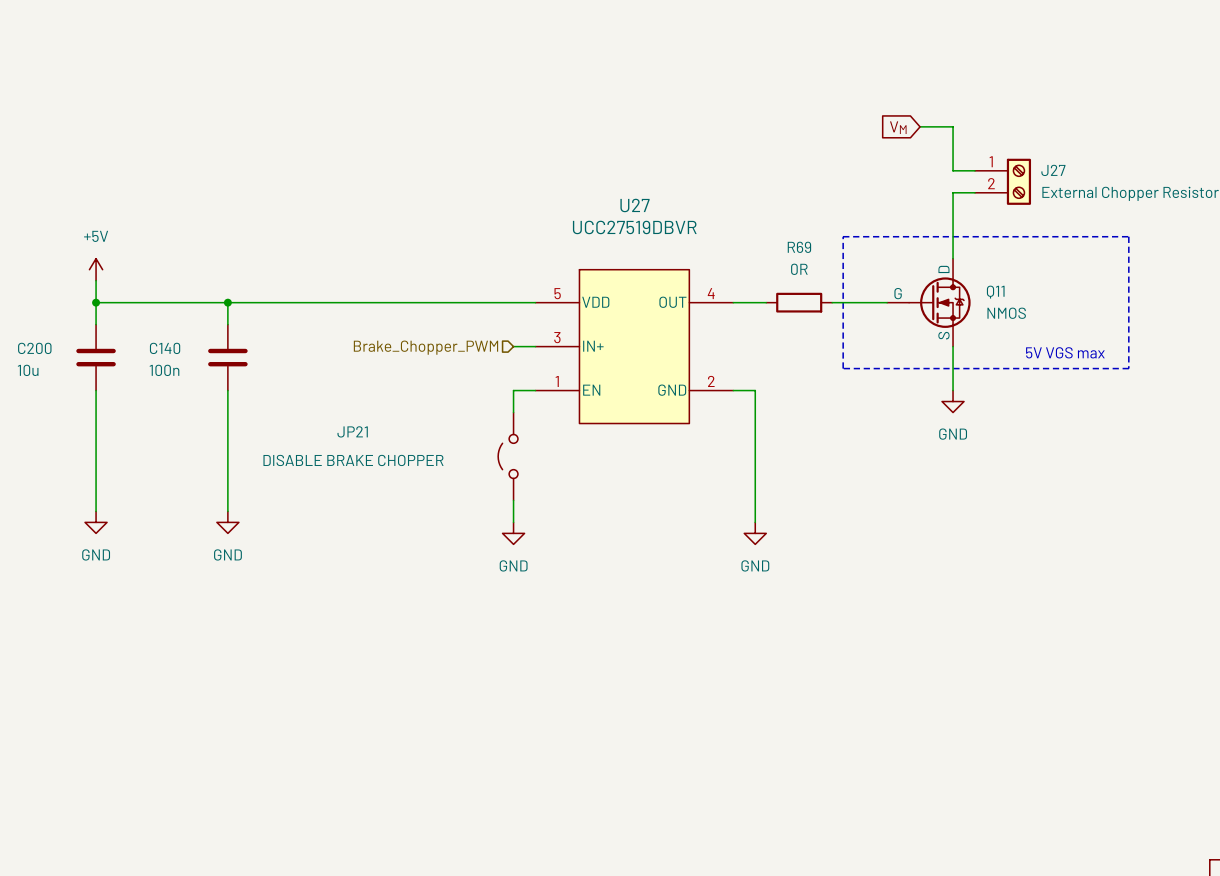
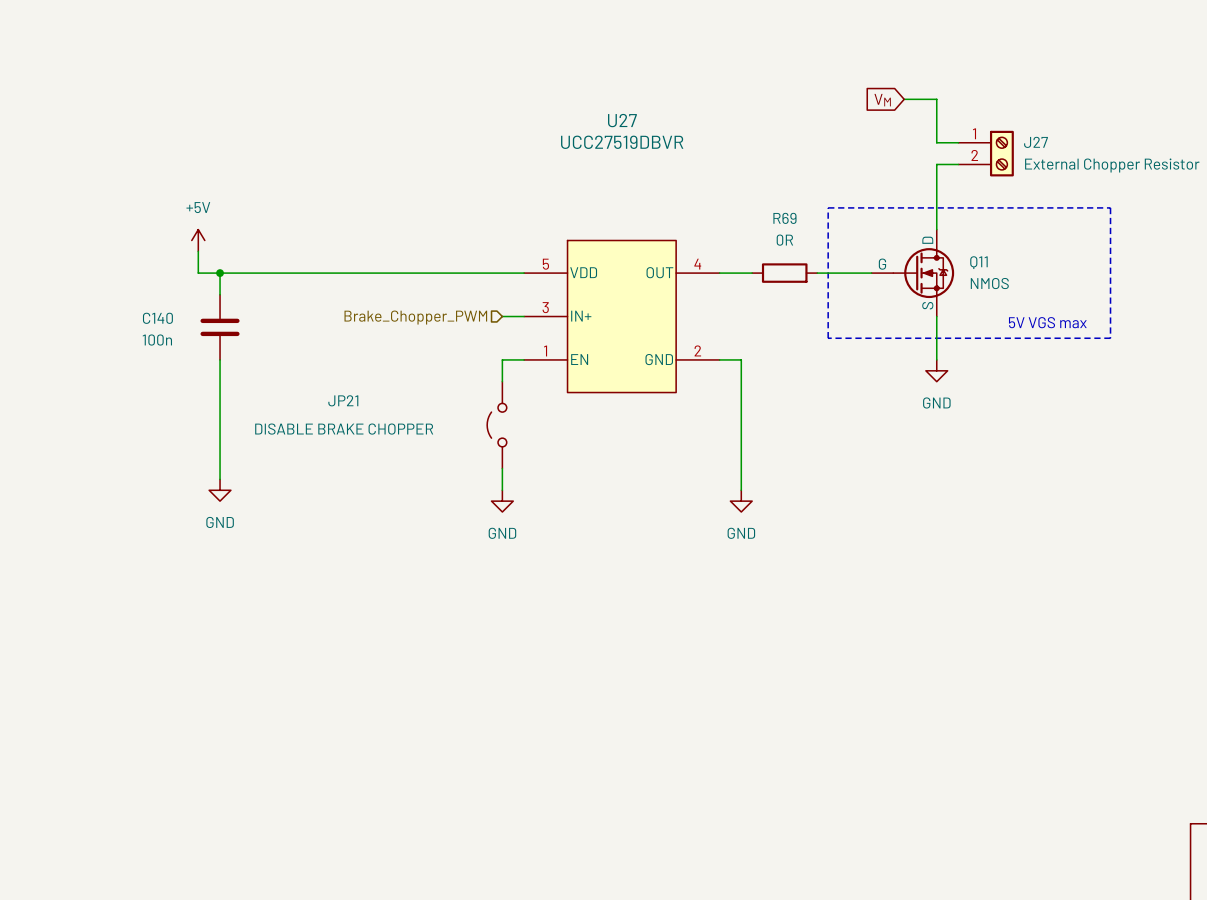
U27 name position: U27 (635, 205) -> U27 (622, 120)
U27 value position: UCC27519DBVR (634, 227) -> UCC27519DBVR (622, 142)
power symbol position: +5V (96, 269) -> +5V (198, 240)
wire: (96, 280) (96, 324) -> none
wire: (96, 302) (205, 302) -> (198, 251) (198, 273)
junction: (96, 302) -> none
C200: 10u (96, 357) -> none
wire: (96, 390) (96, 511) -> none
power symbol: GND (96, 522) -> none

